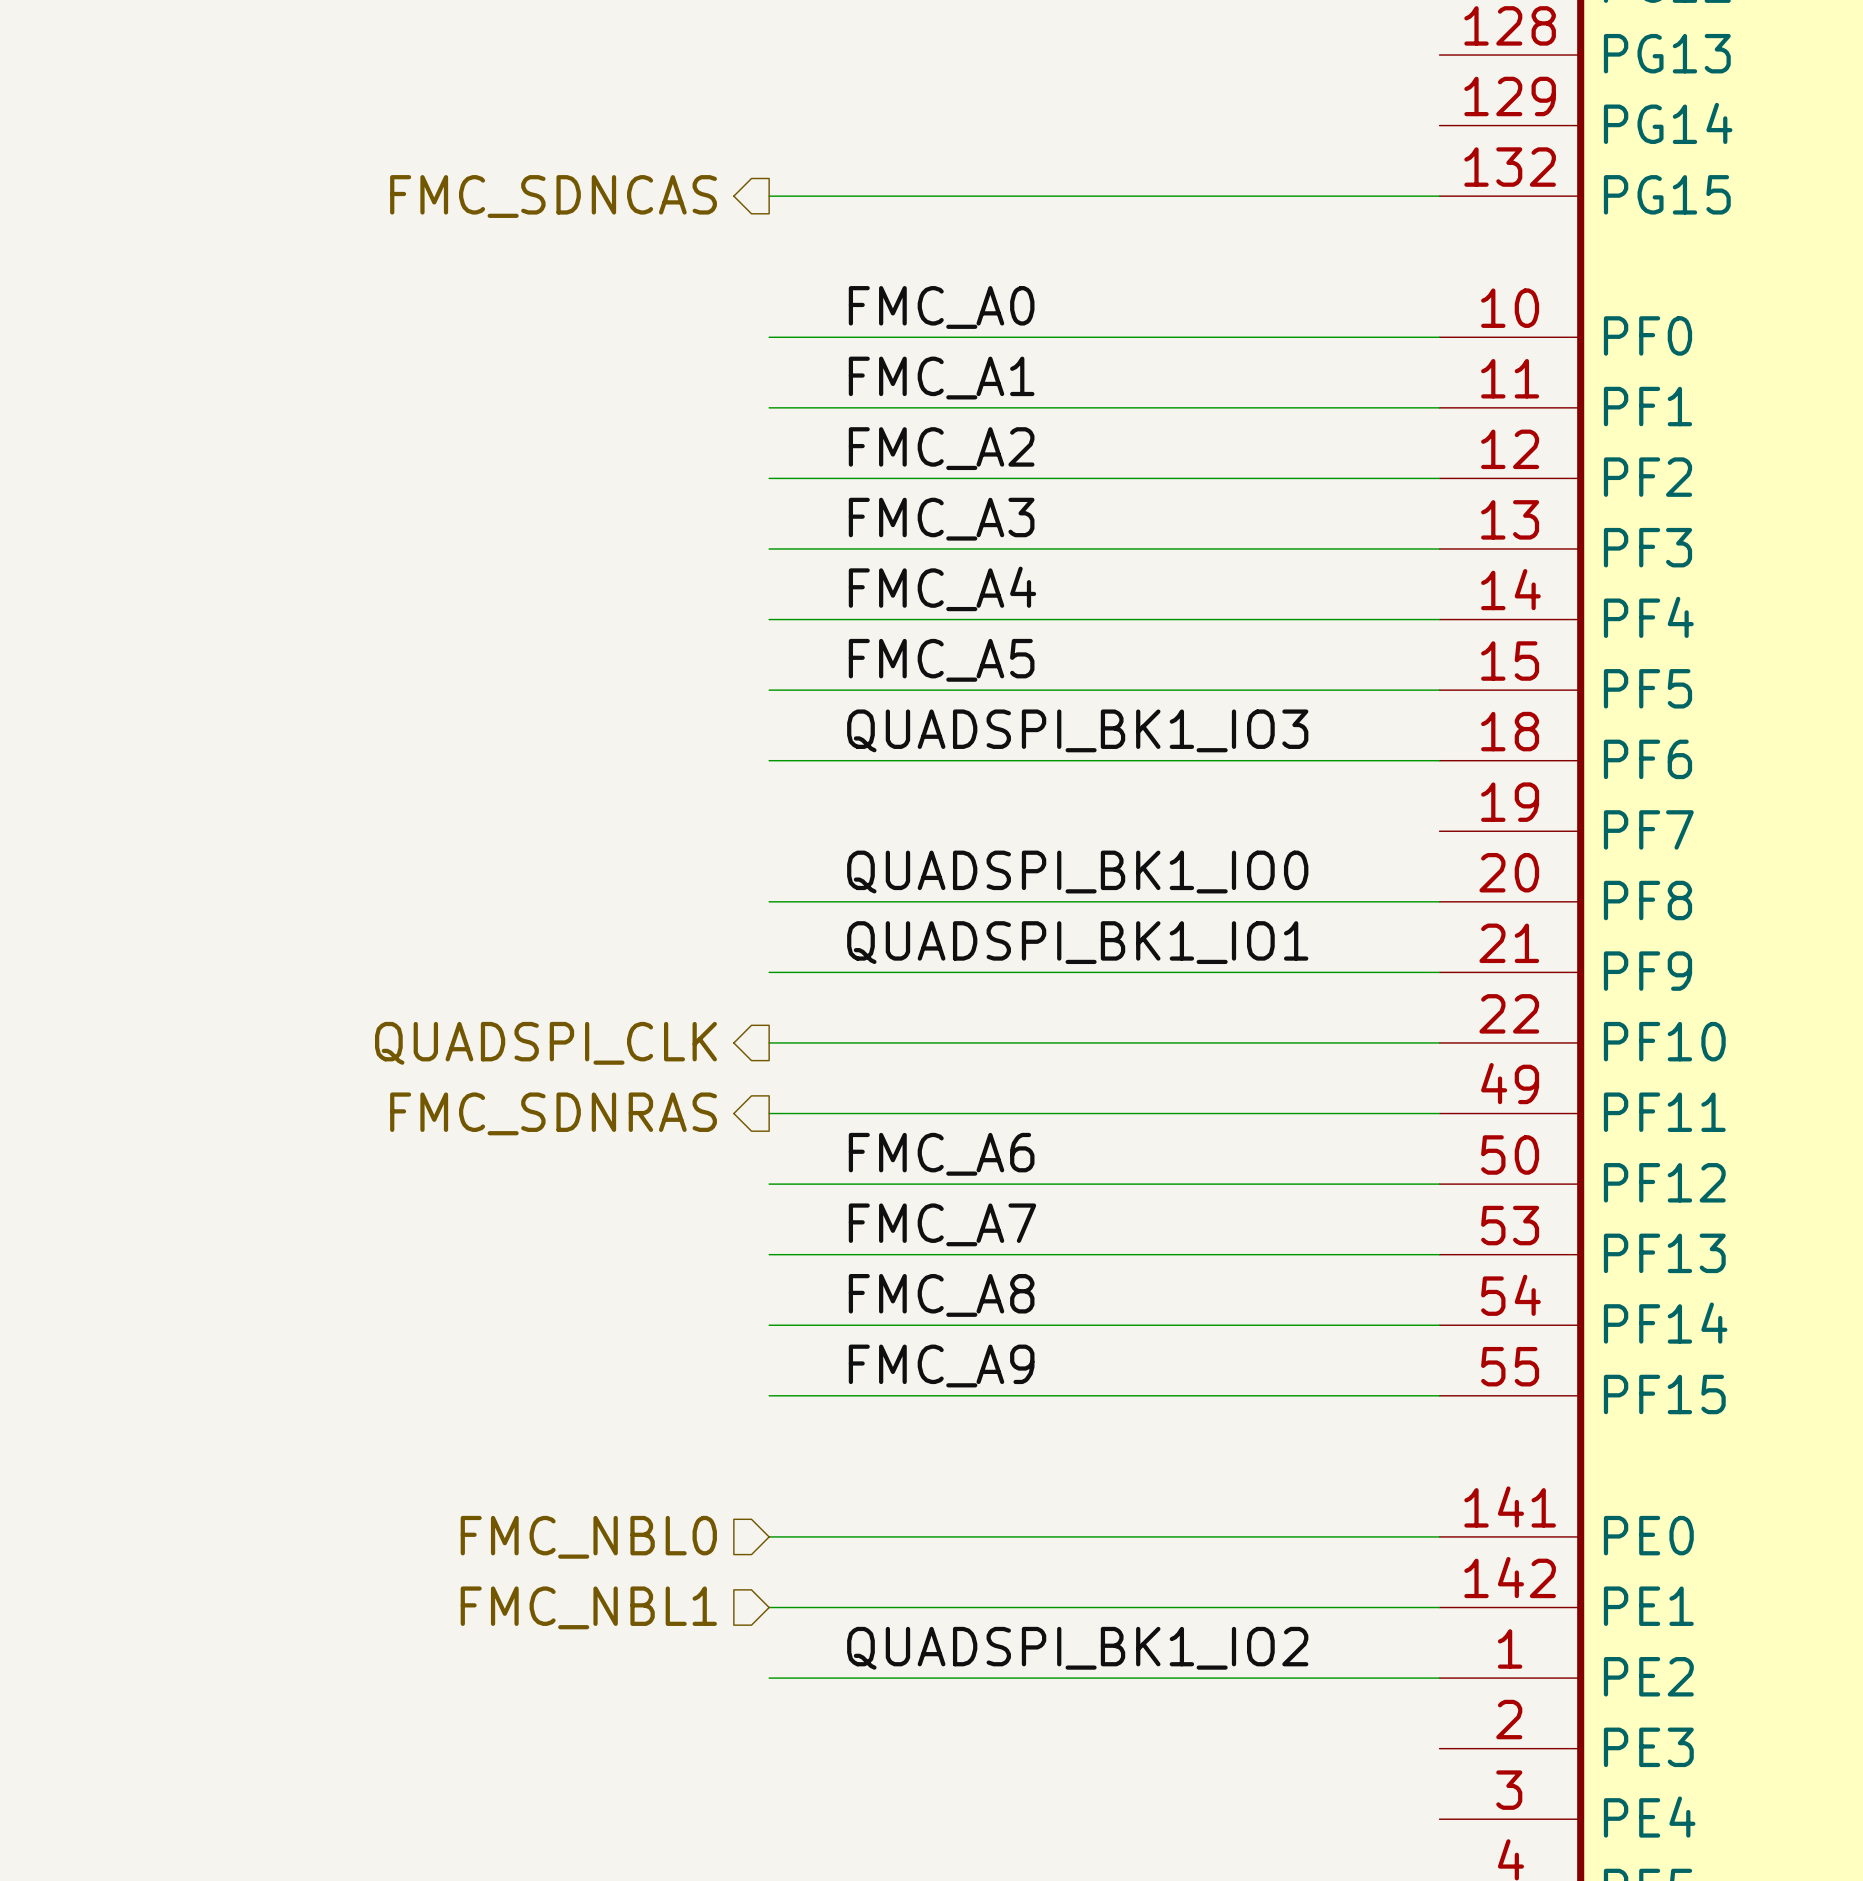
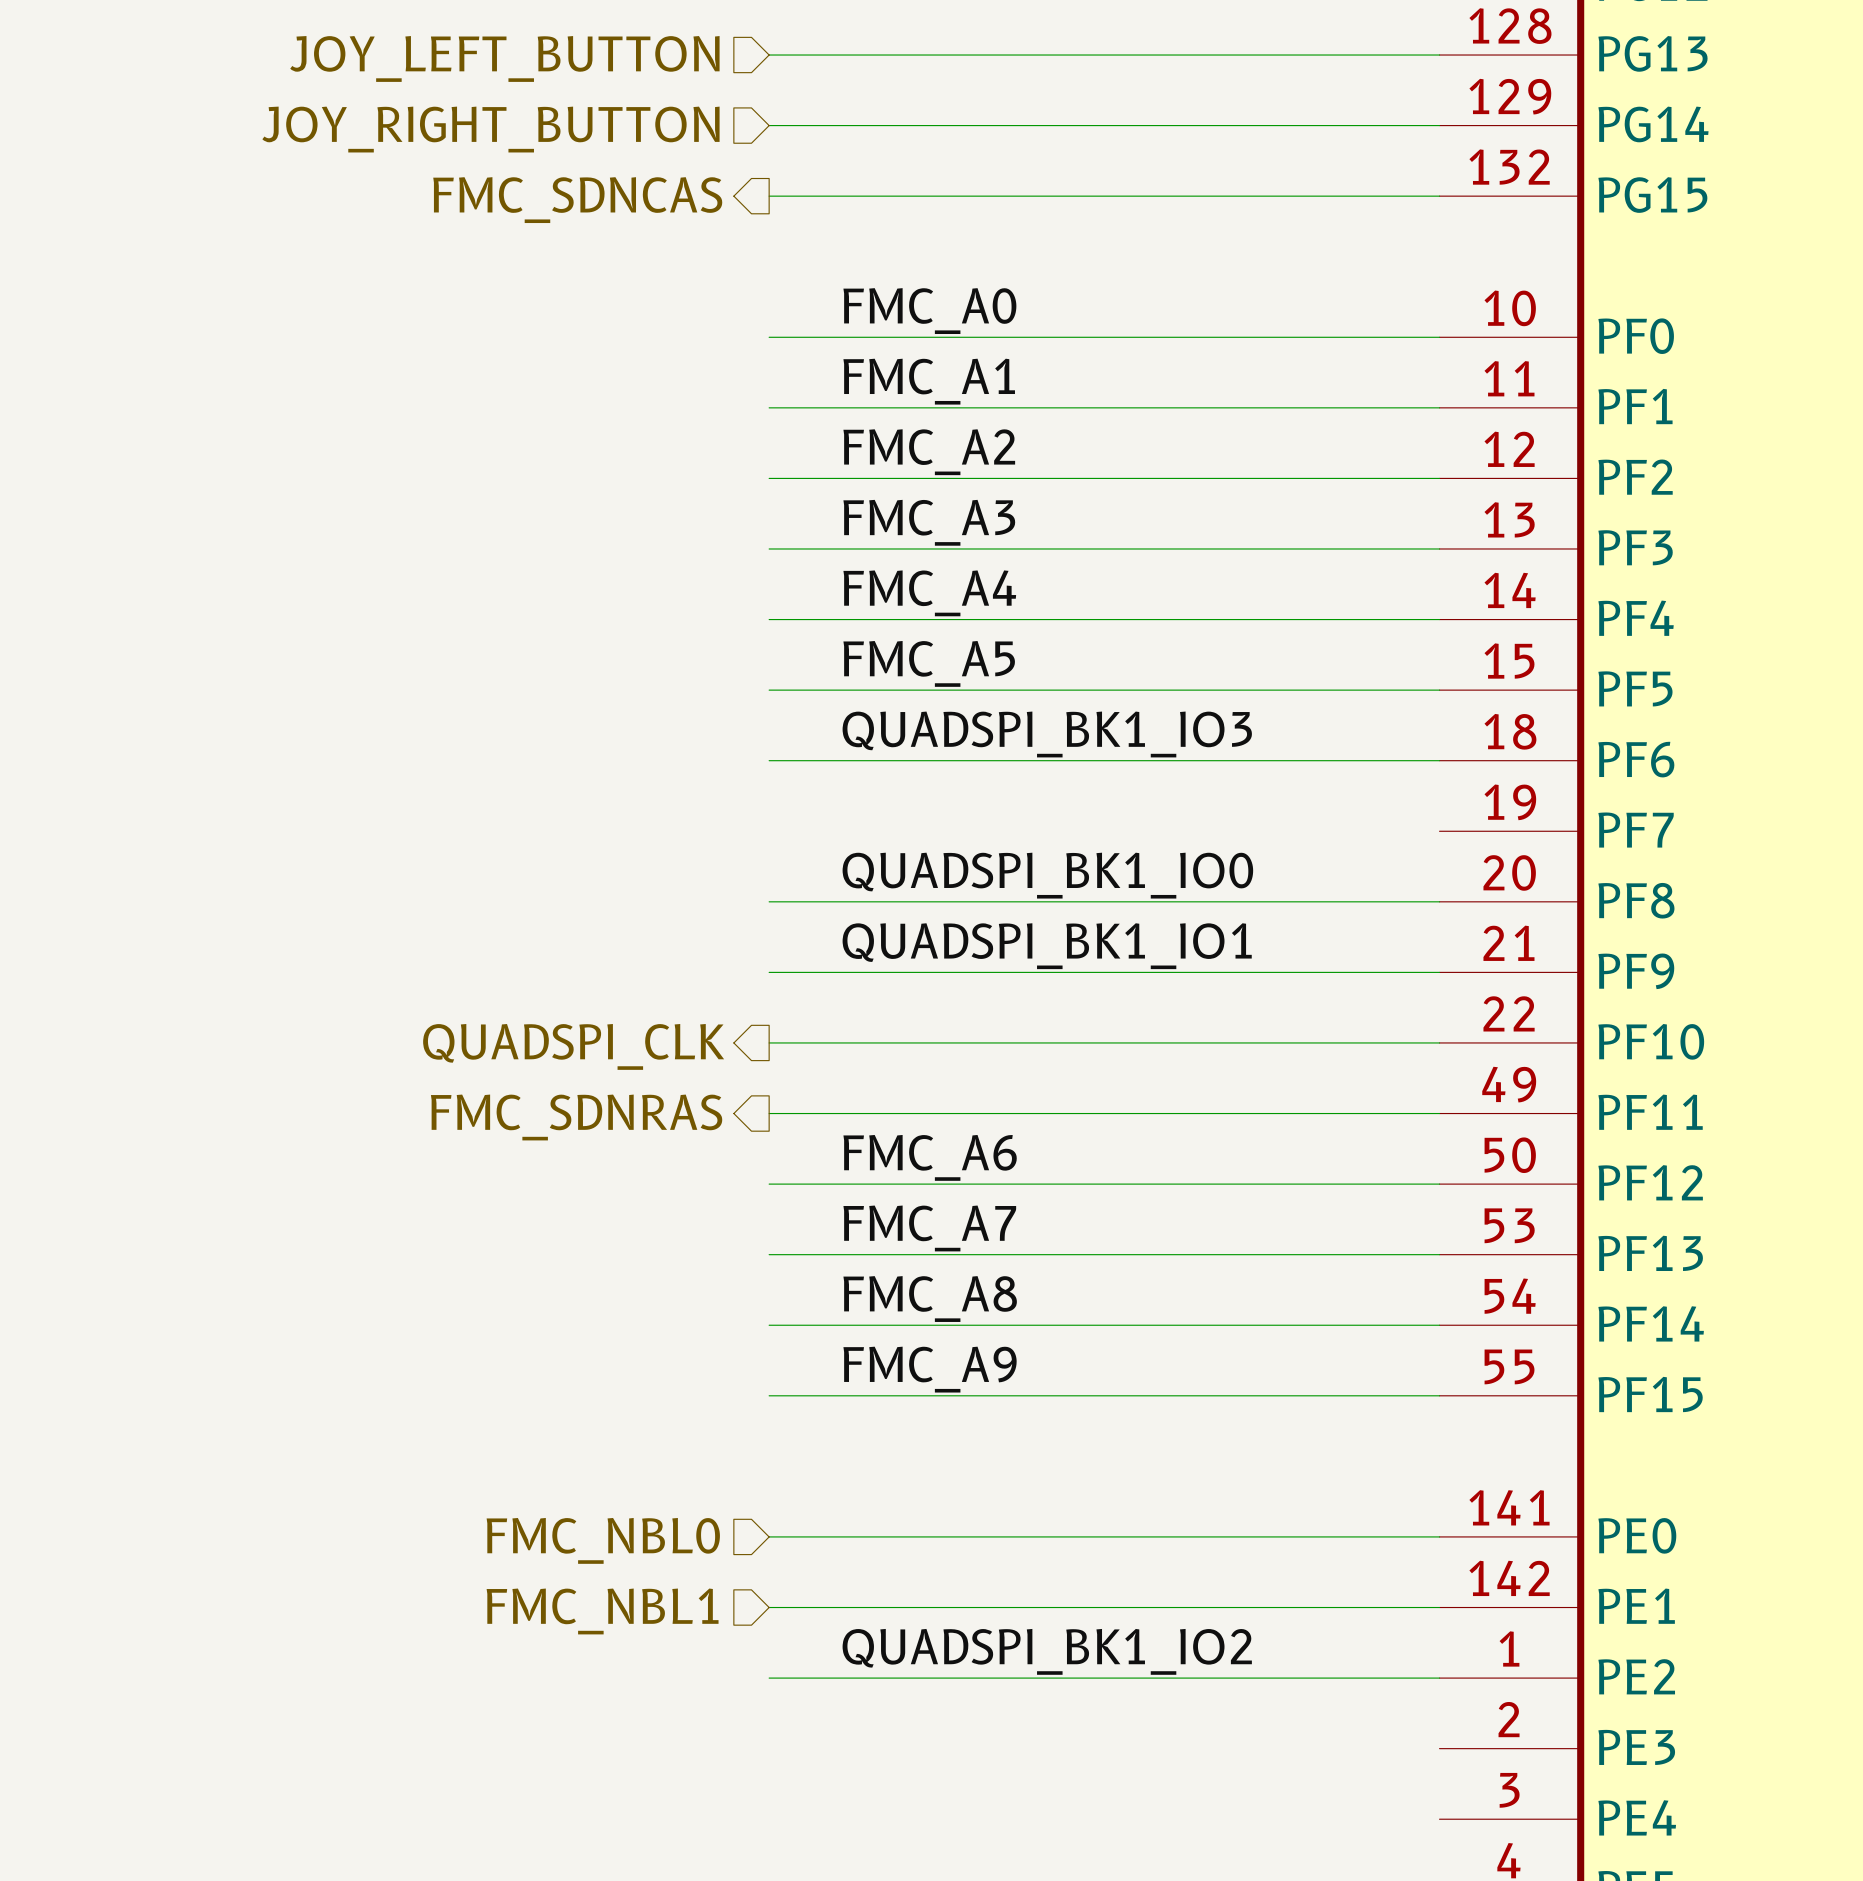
hierarchical label: none -> JOY_LEFT_BUTTON (504, 58)
wire: none -> (769, 55) (1439, 55)
hierarchical label: none -> JOY_RIGHT_BUTTON (490, 129)
wire: none -> (769, 125) (1439, 125)

